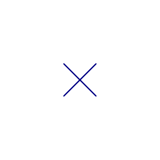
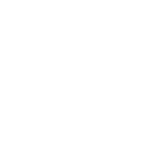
no-connect mark: (79, 79) -> none

